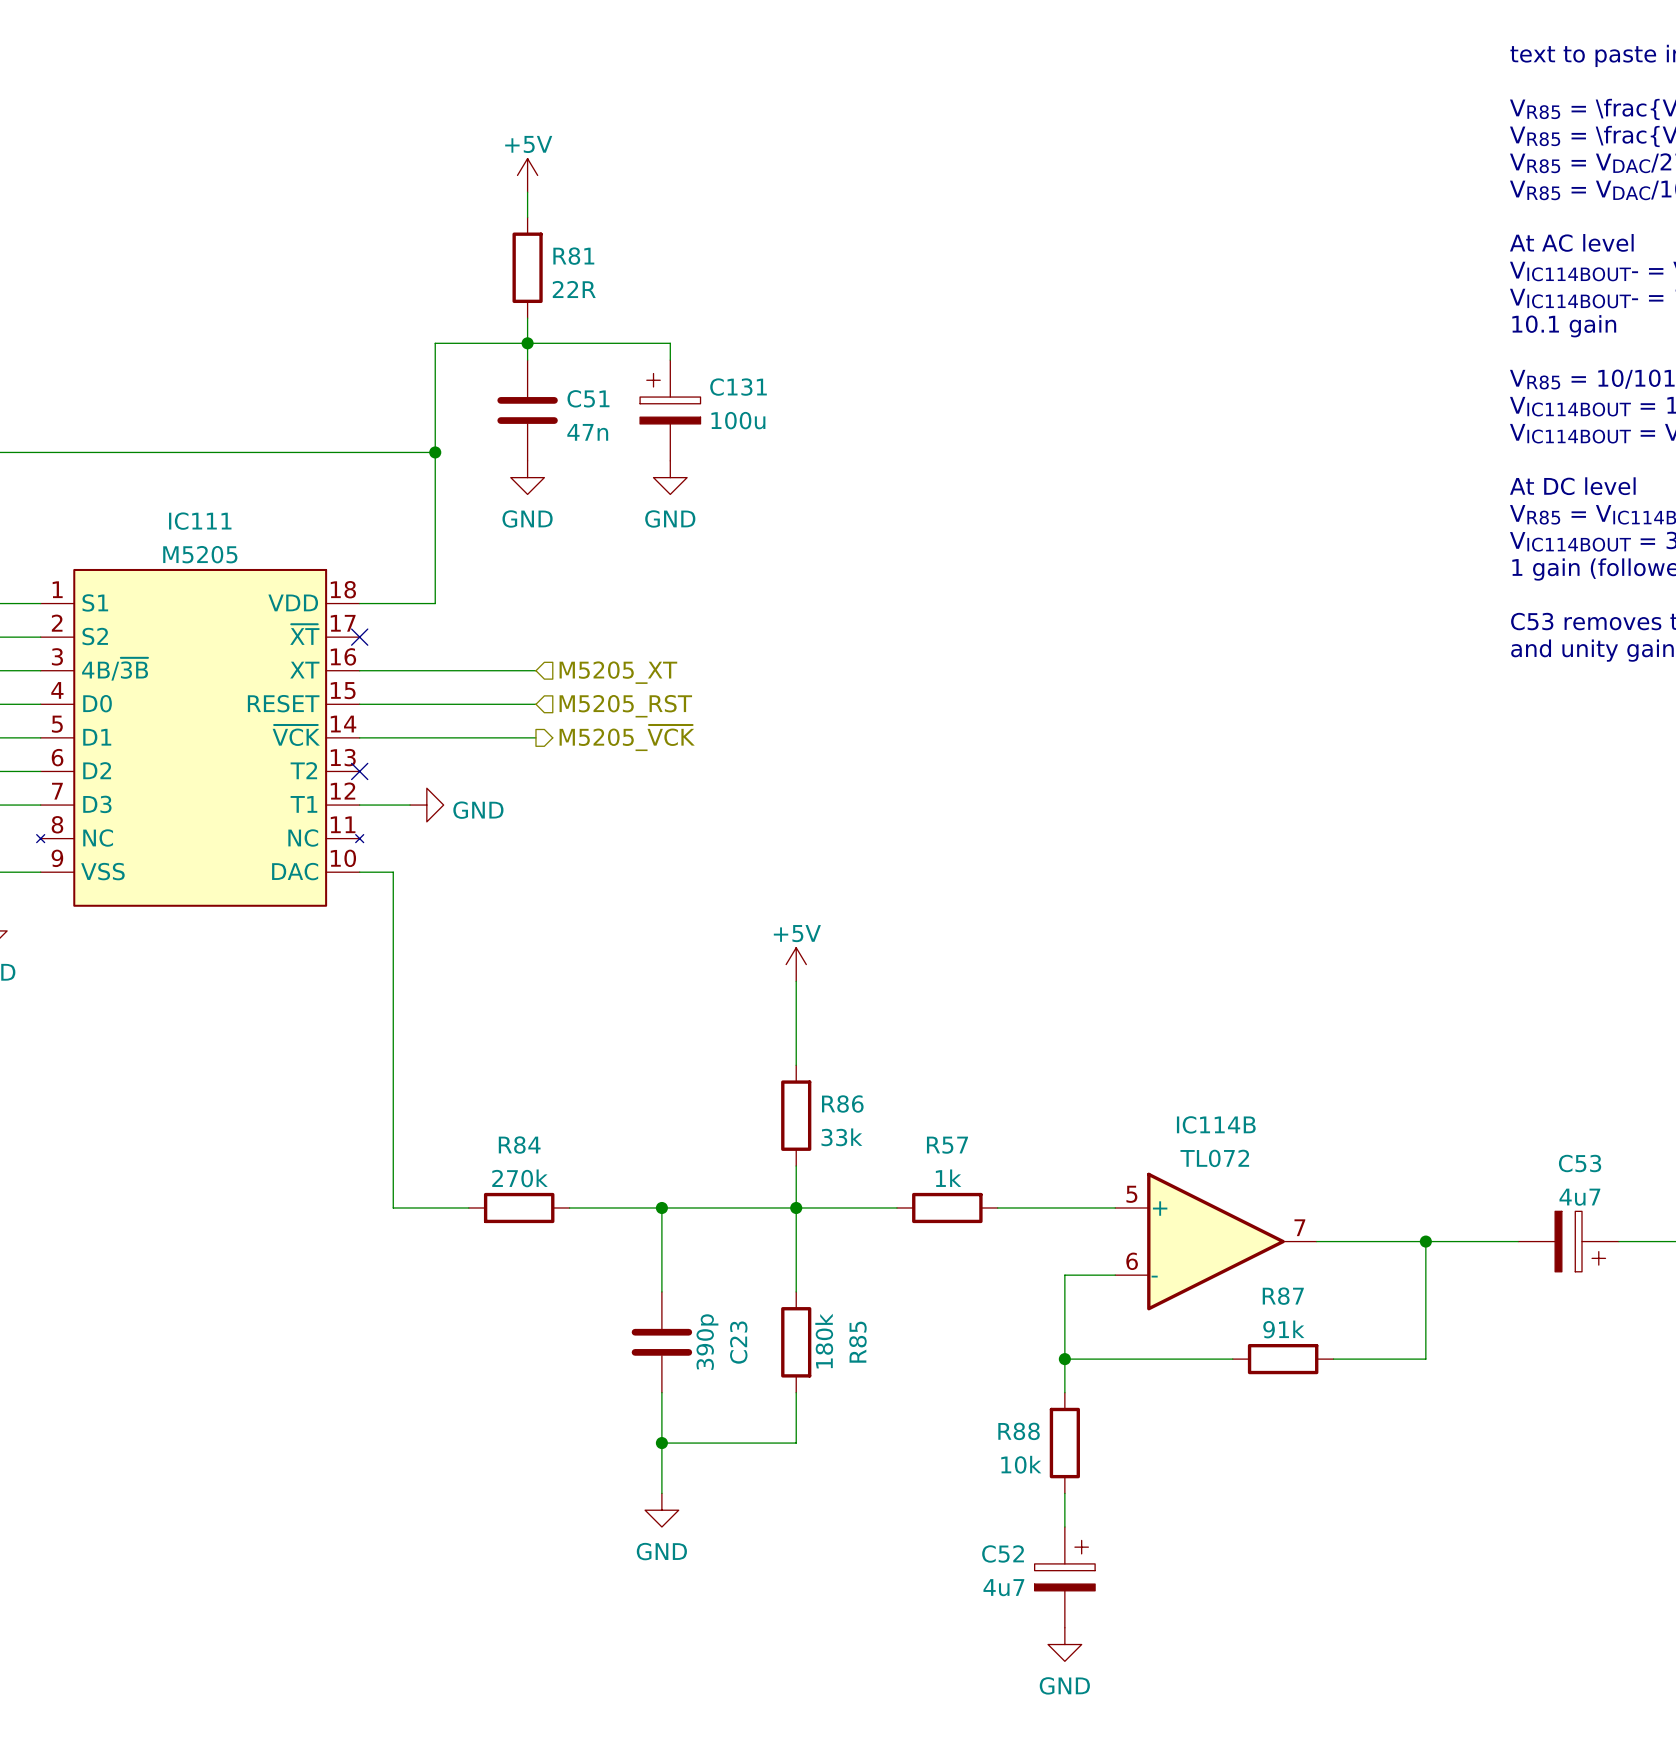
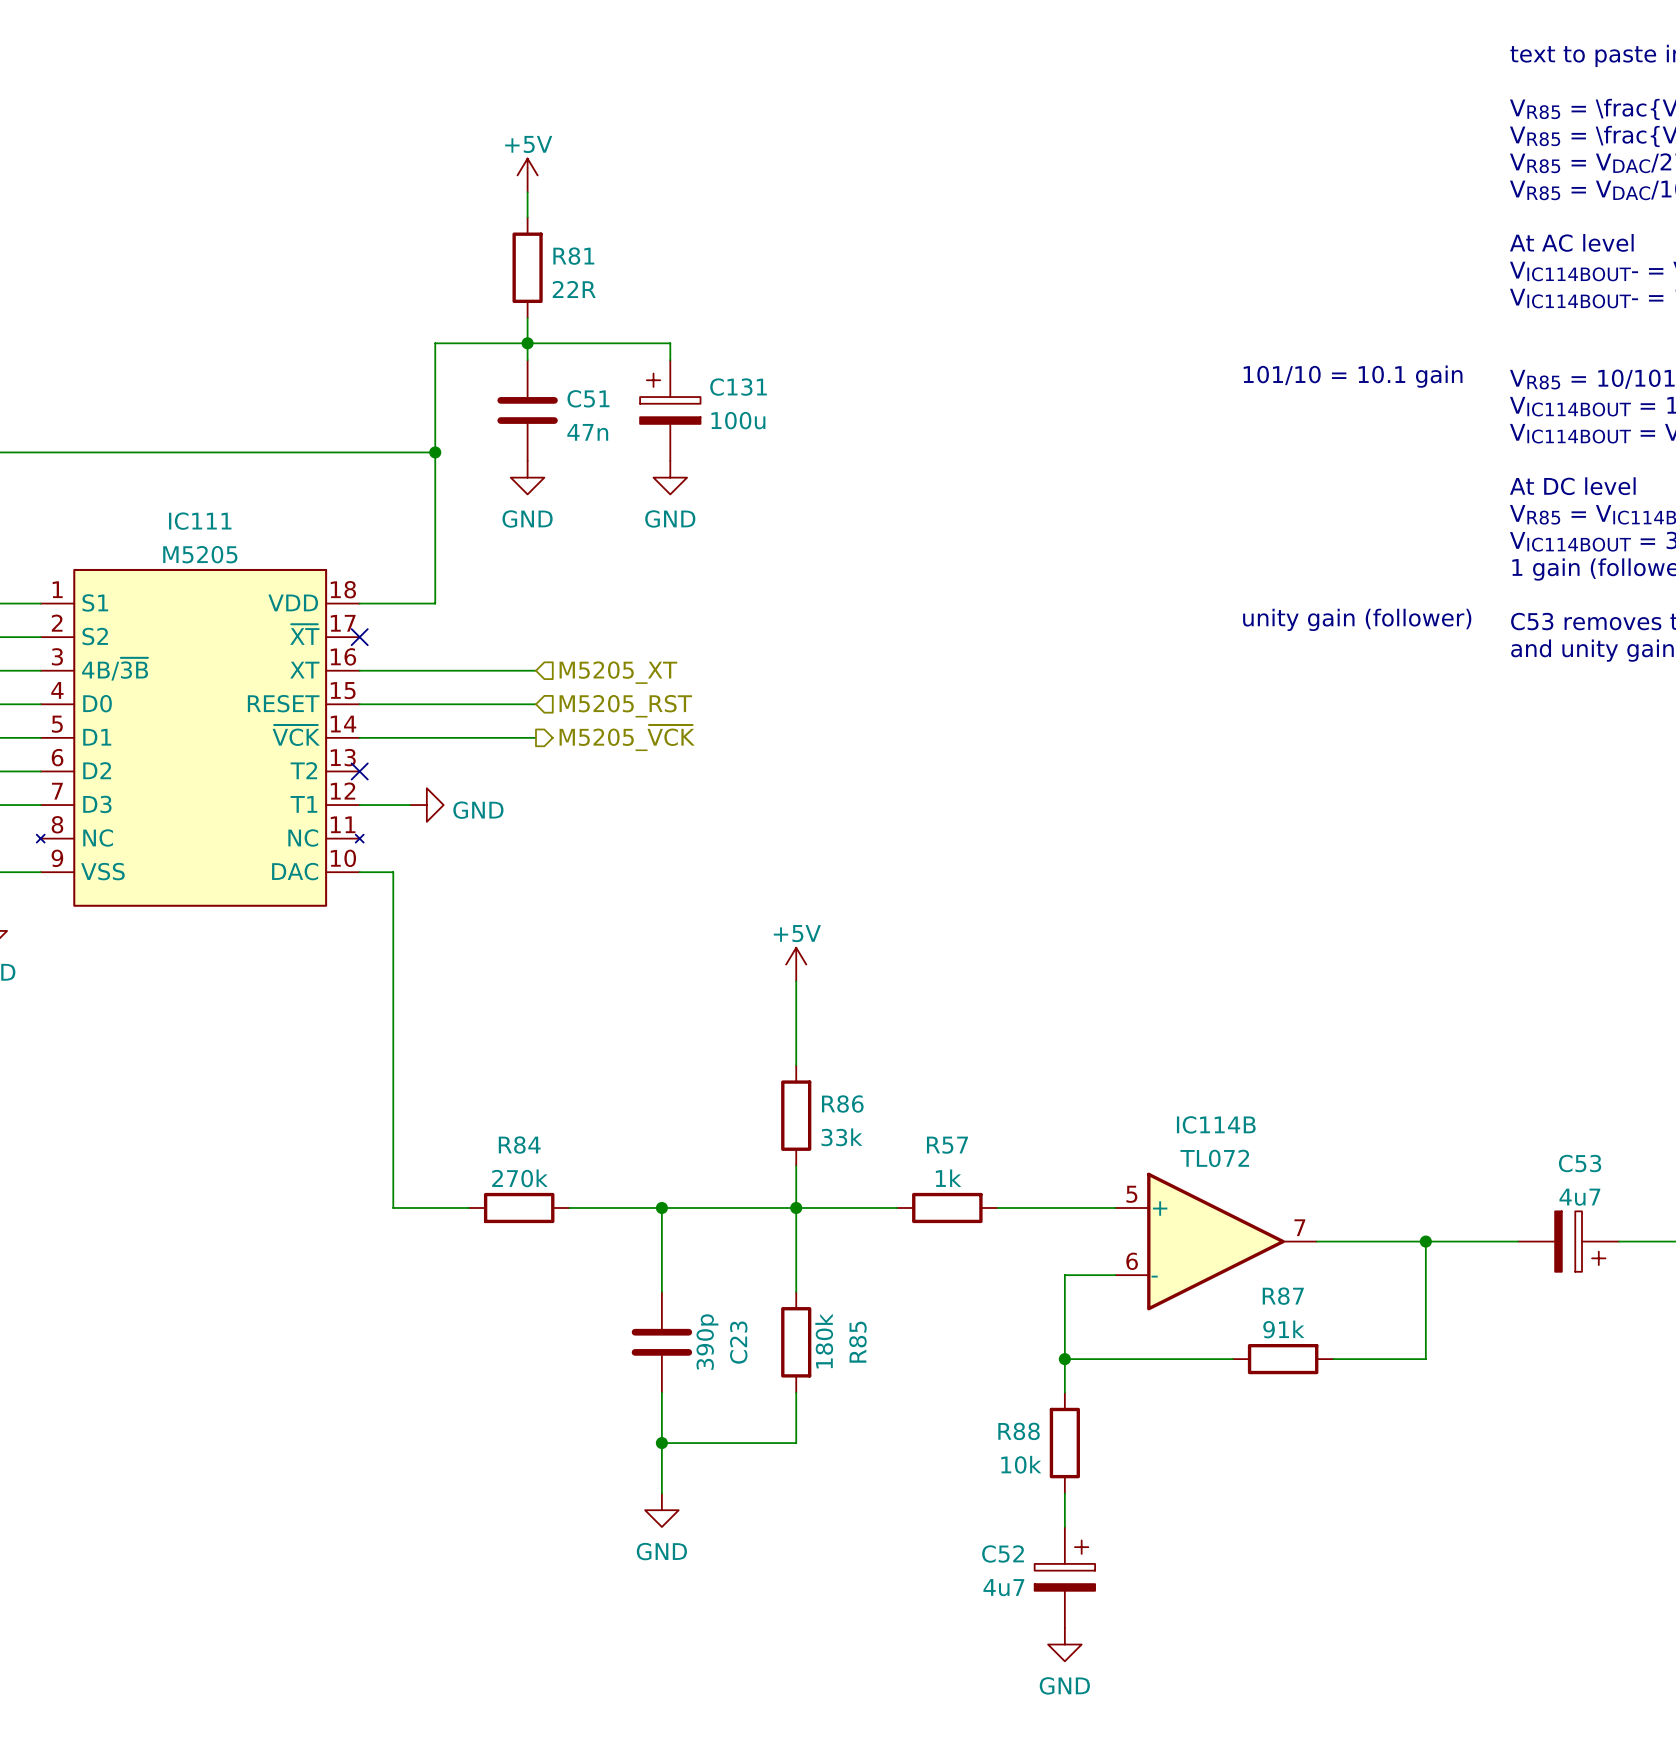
text: 10.1 gain (1564, 326) -> none
text: none -> 101/10 = 10.1 gain (1353, 376)
text: none -> unity gain (follower) (1357, 619)

